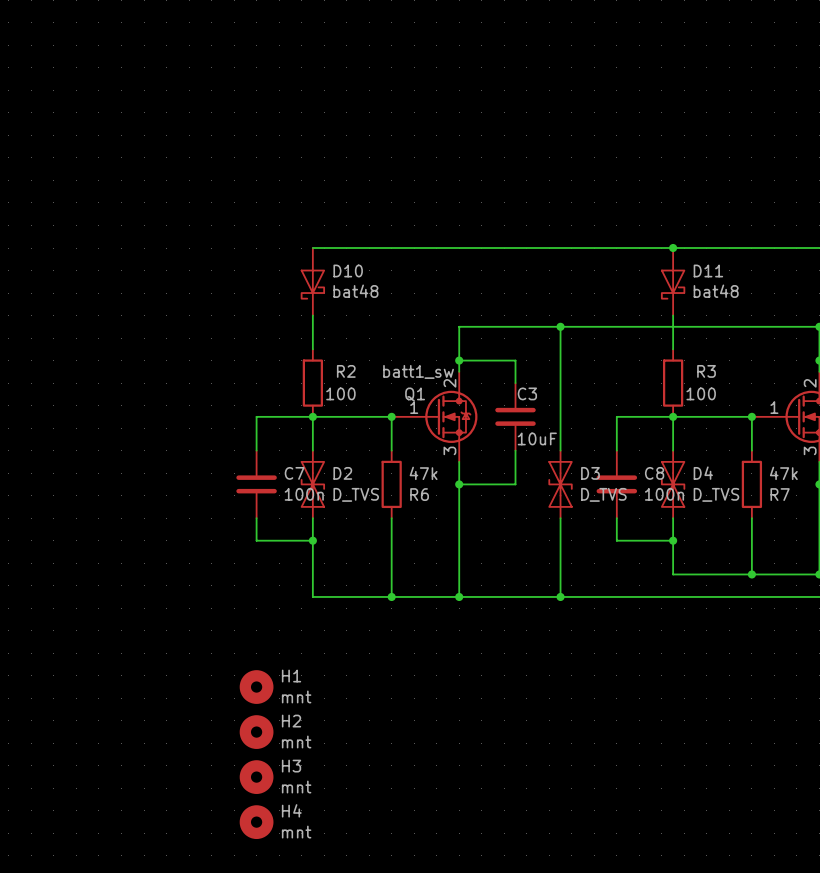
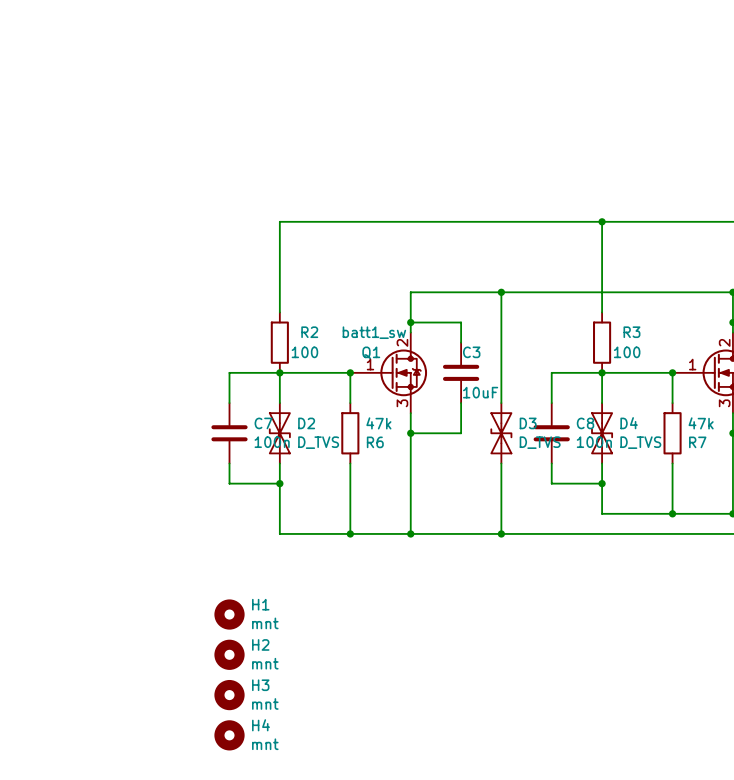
D10: bat48 (312, 281) -> none
D11: bat48 (673, 281) -> none

